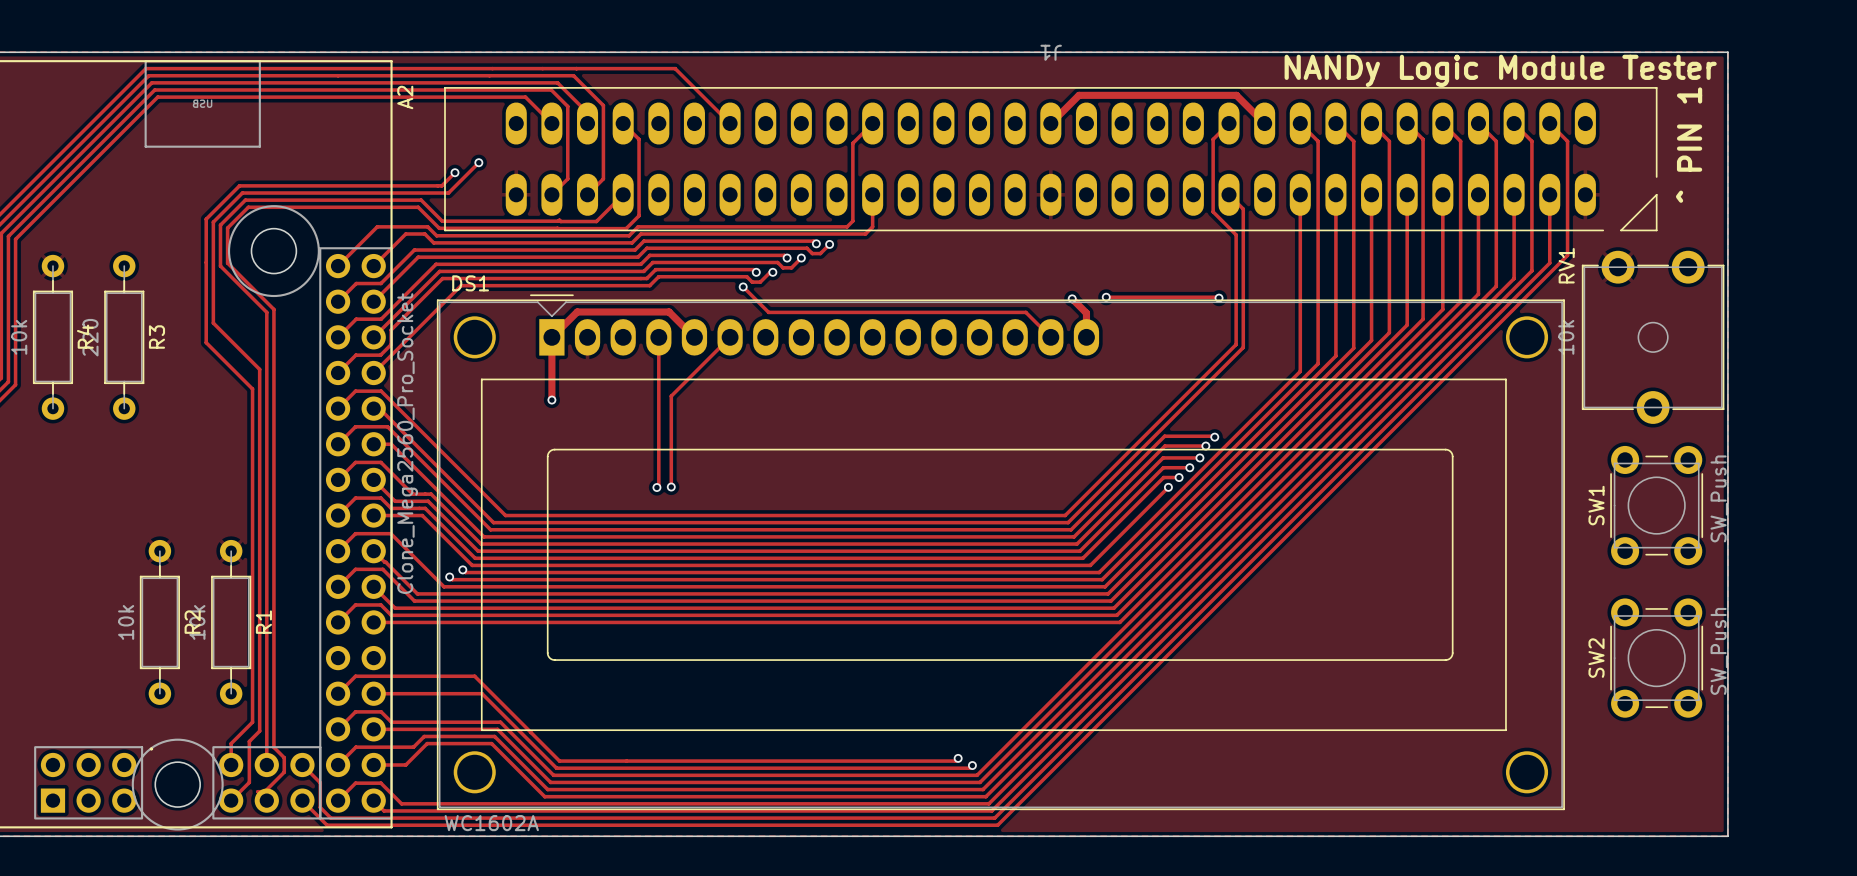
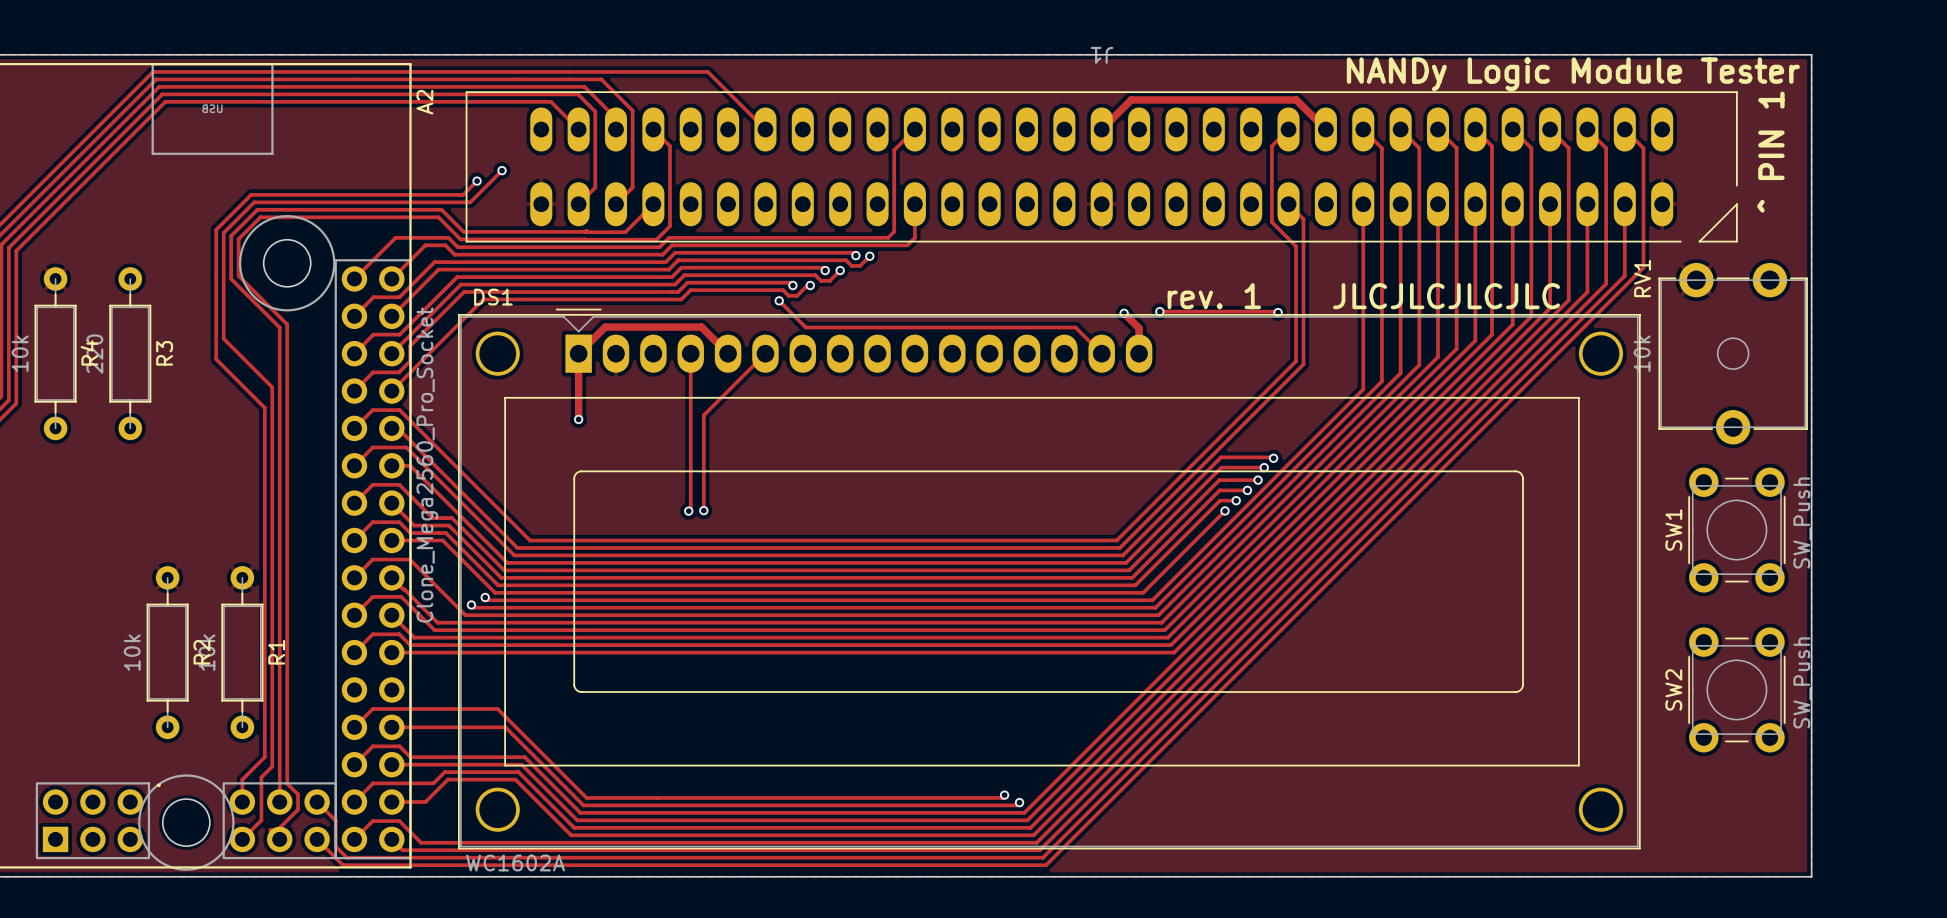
text: none -> rev. 1 JLCJLCJLCJLC (1363, 296)

